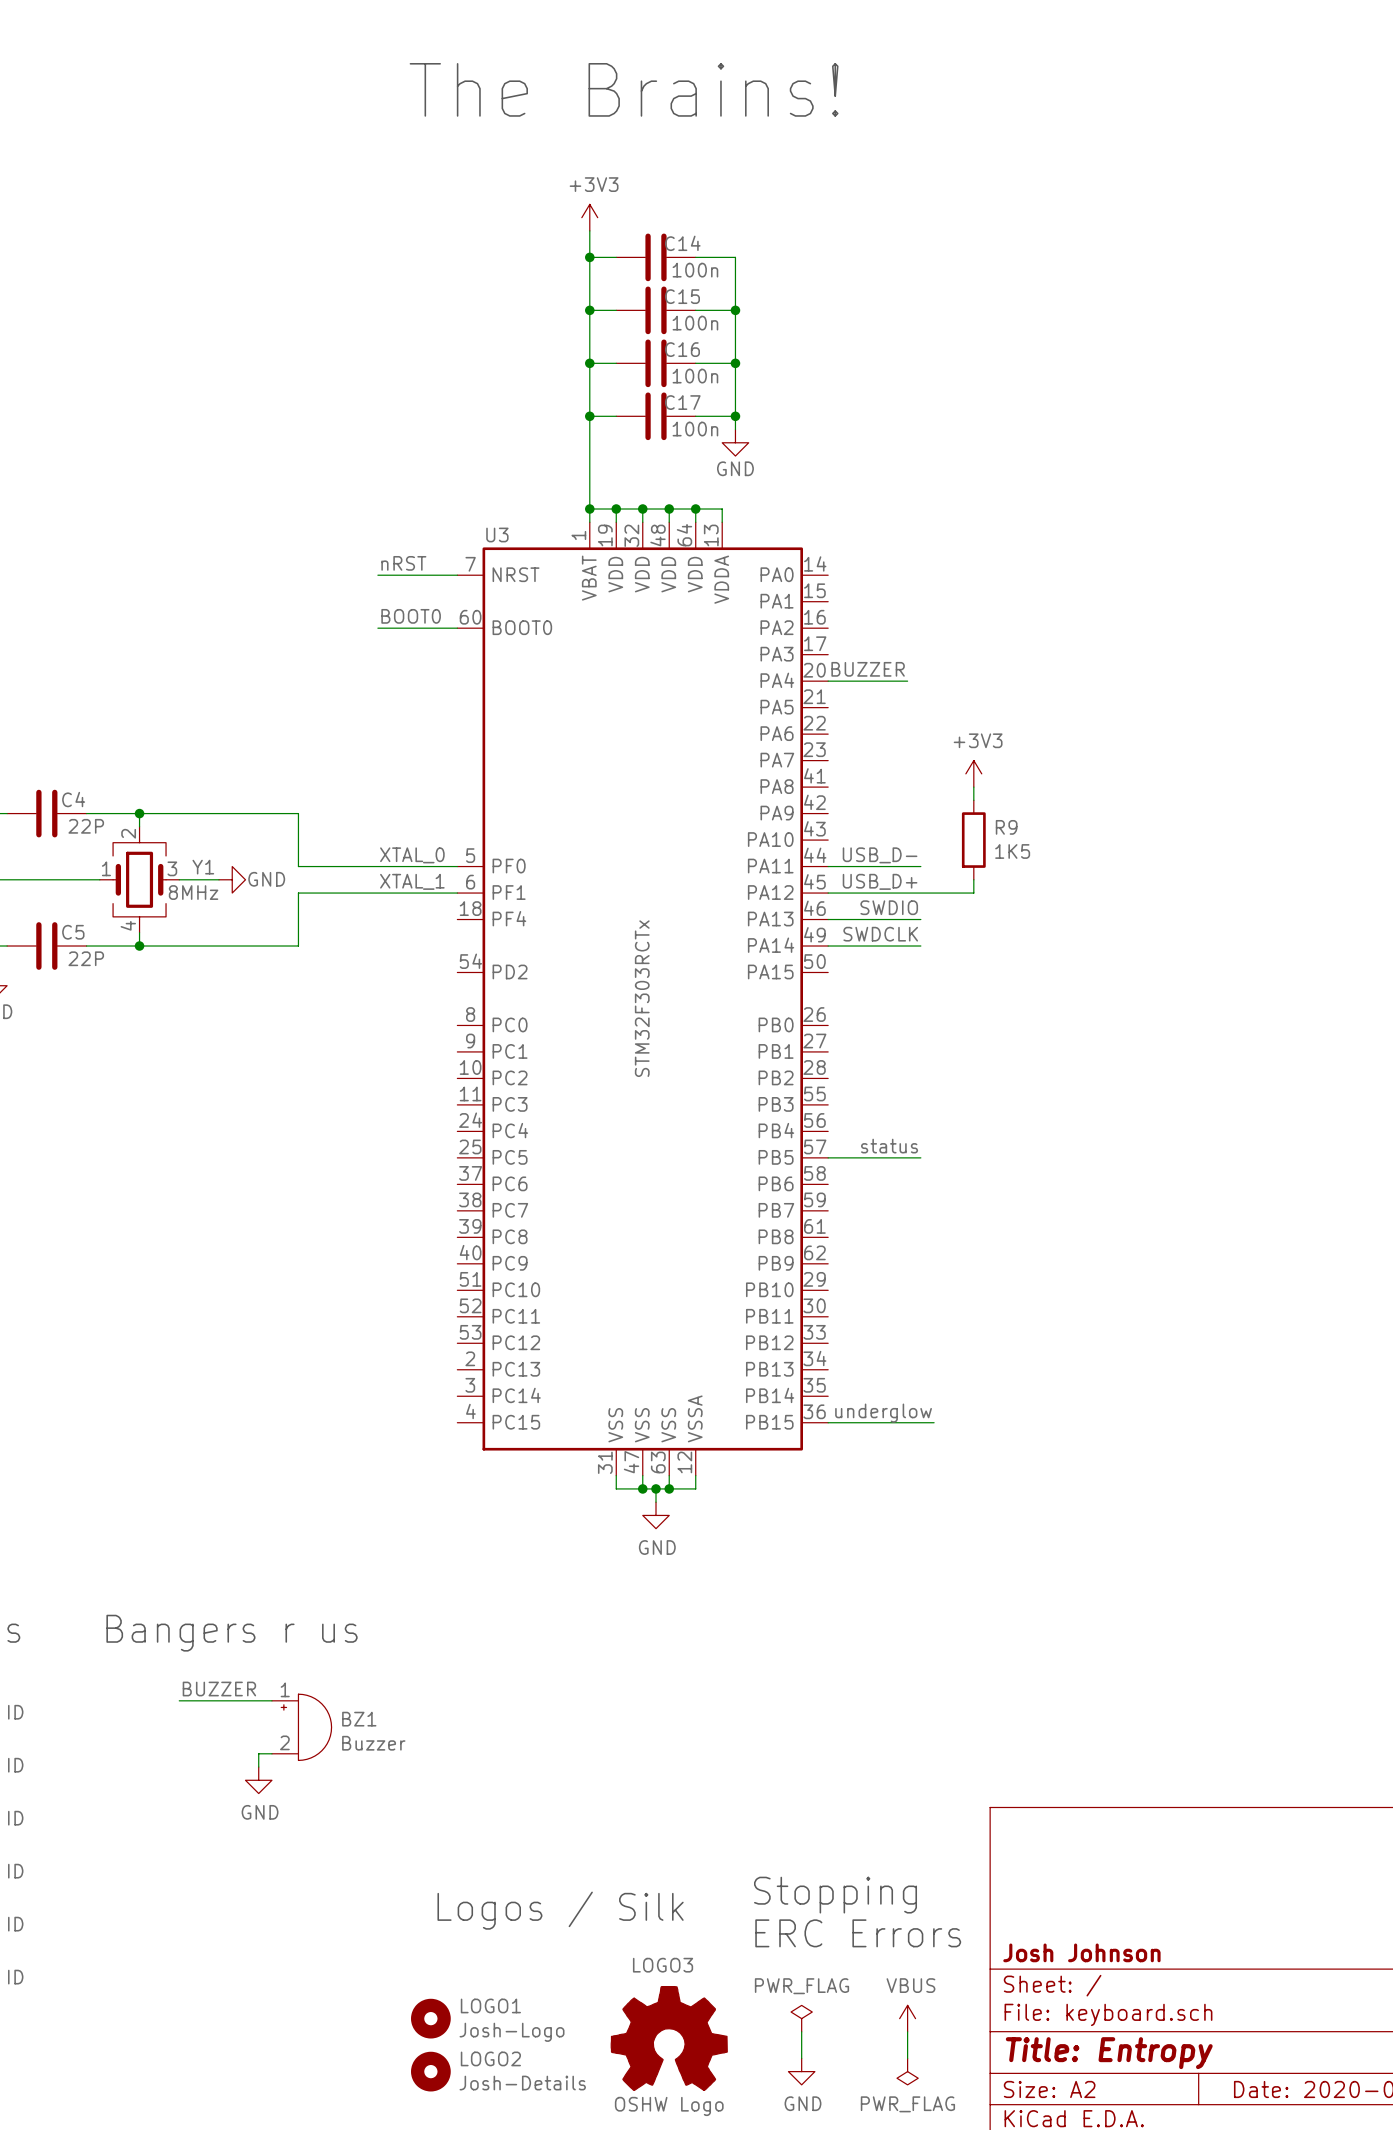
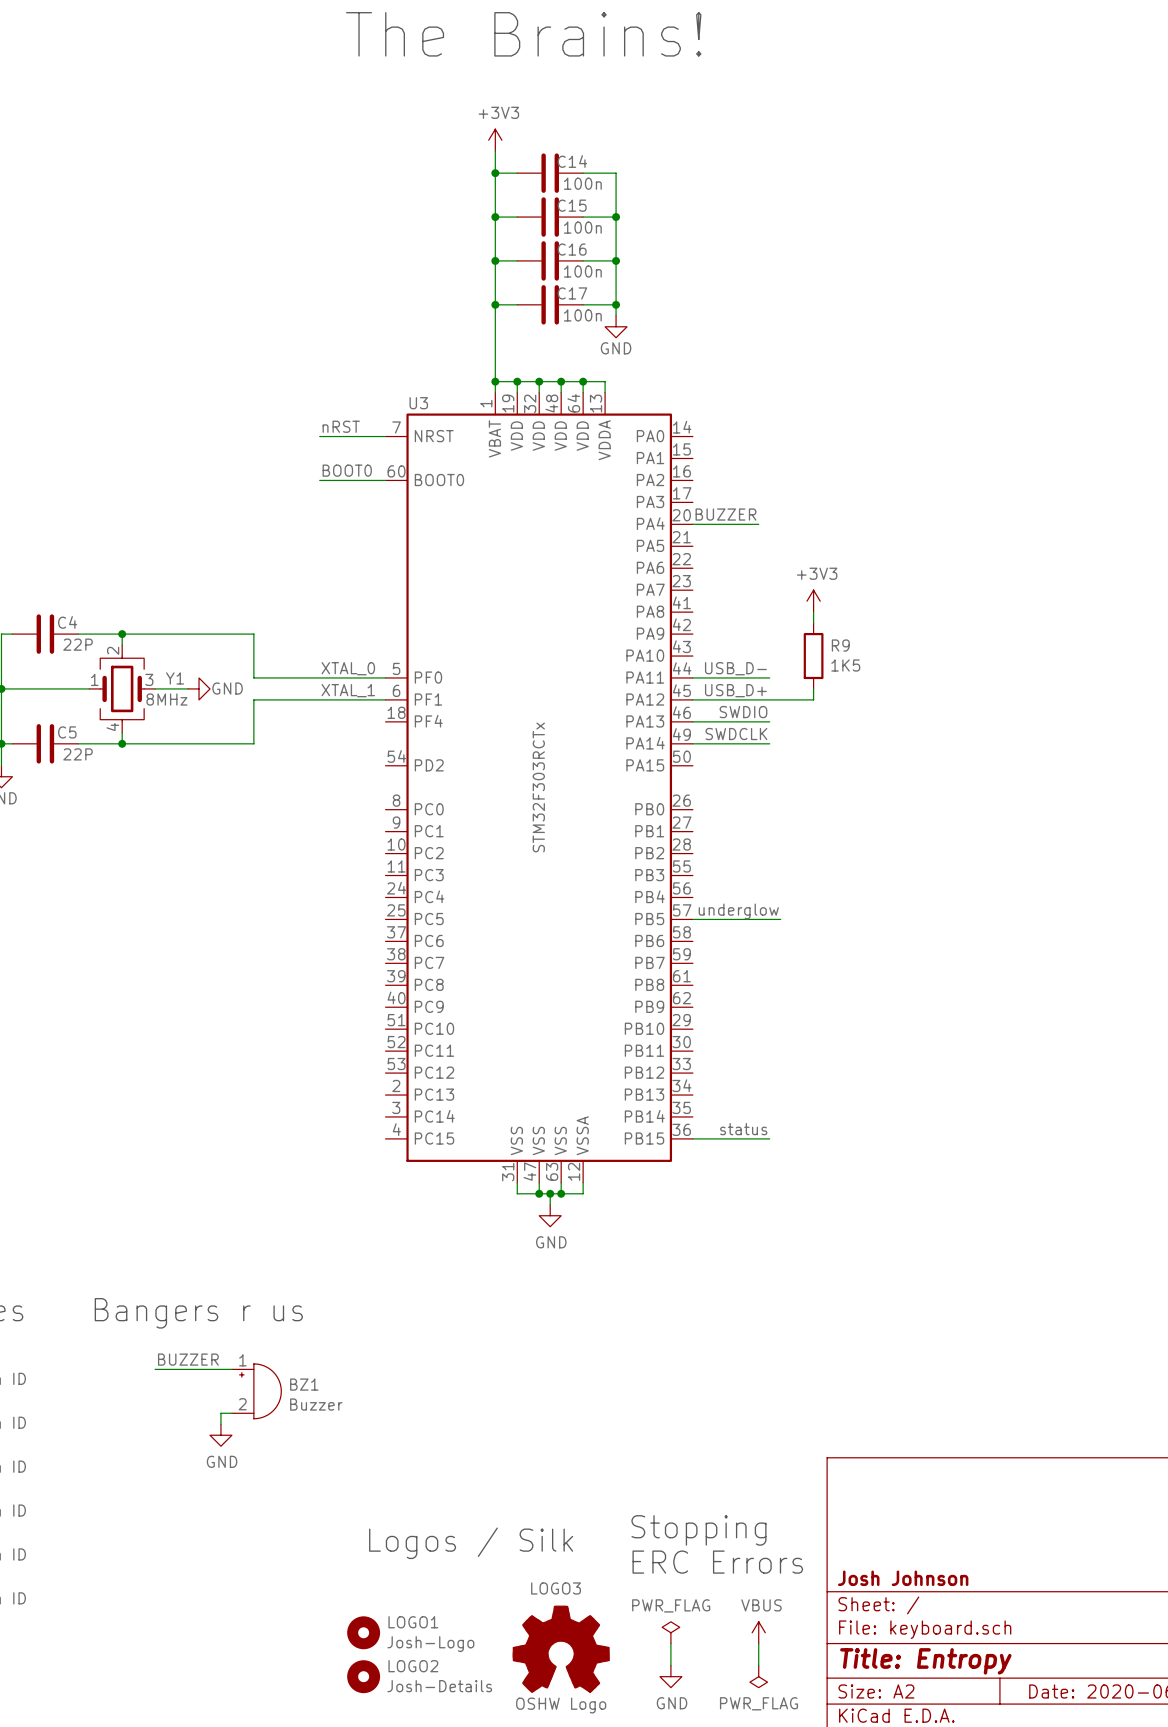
label: status (889, 1146) -> none
label: none -> underglow (738, 911)
wire: none -> (769, 919) (780, 919)
label: none -> status (743, 1129)
label: underglow (883, 1413) -> none
wire: (920, 1422) (934, 1422) -> none

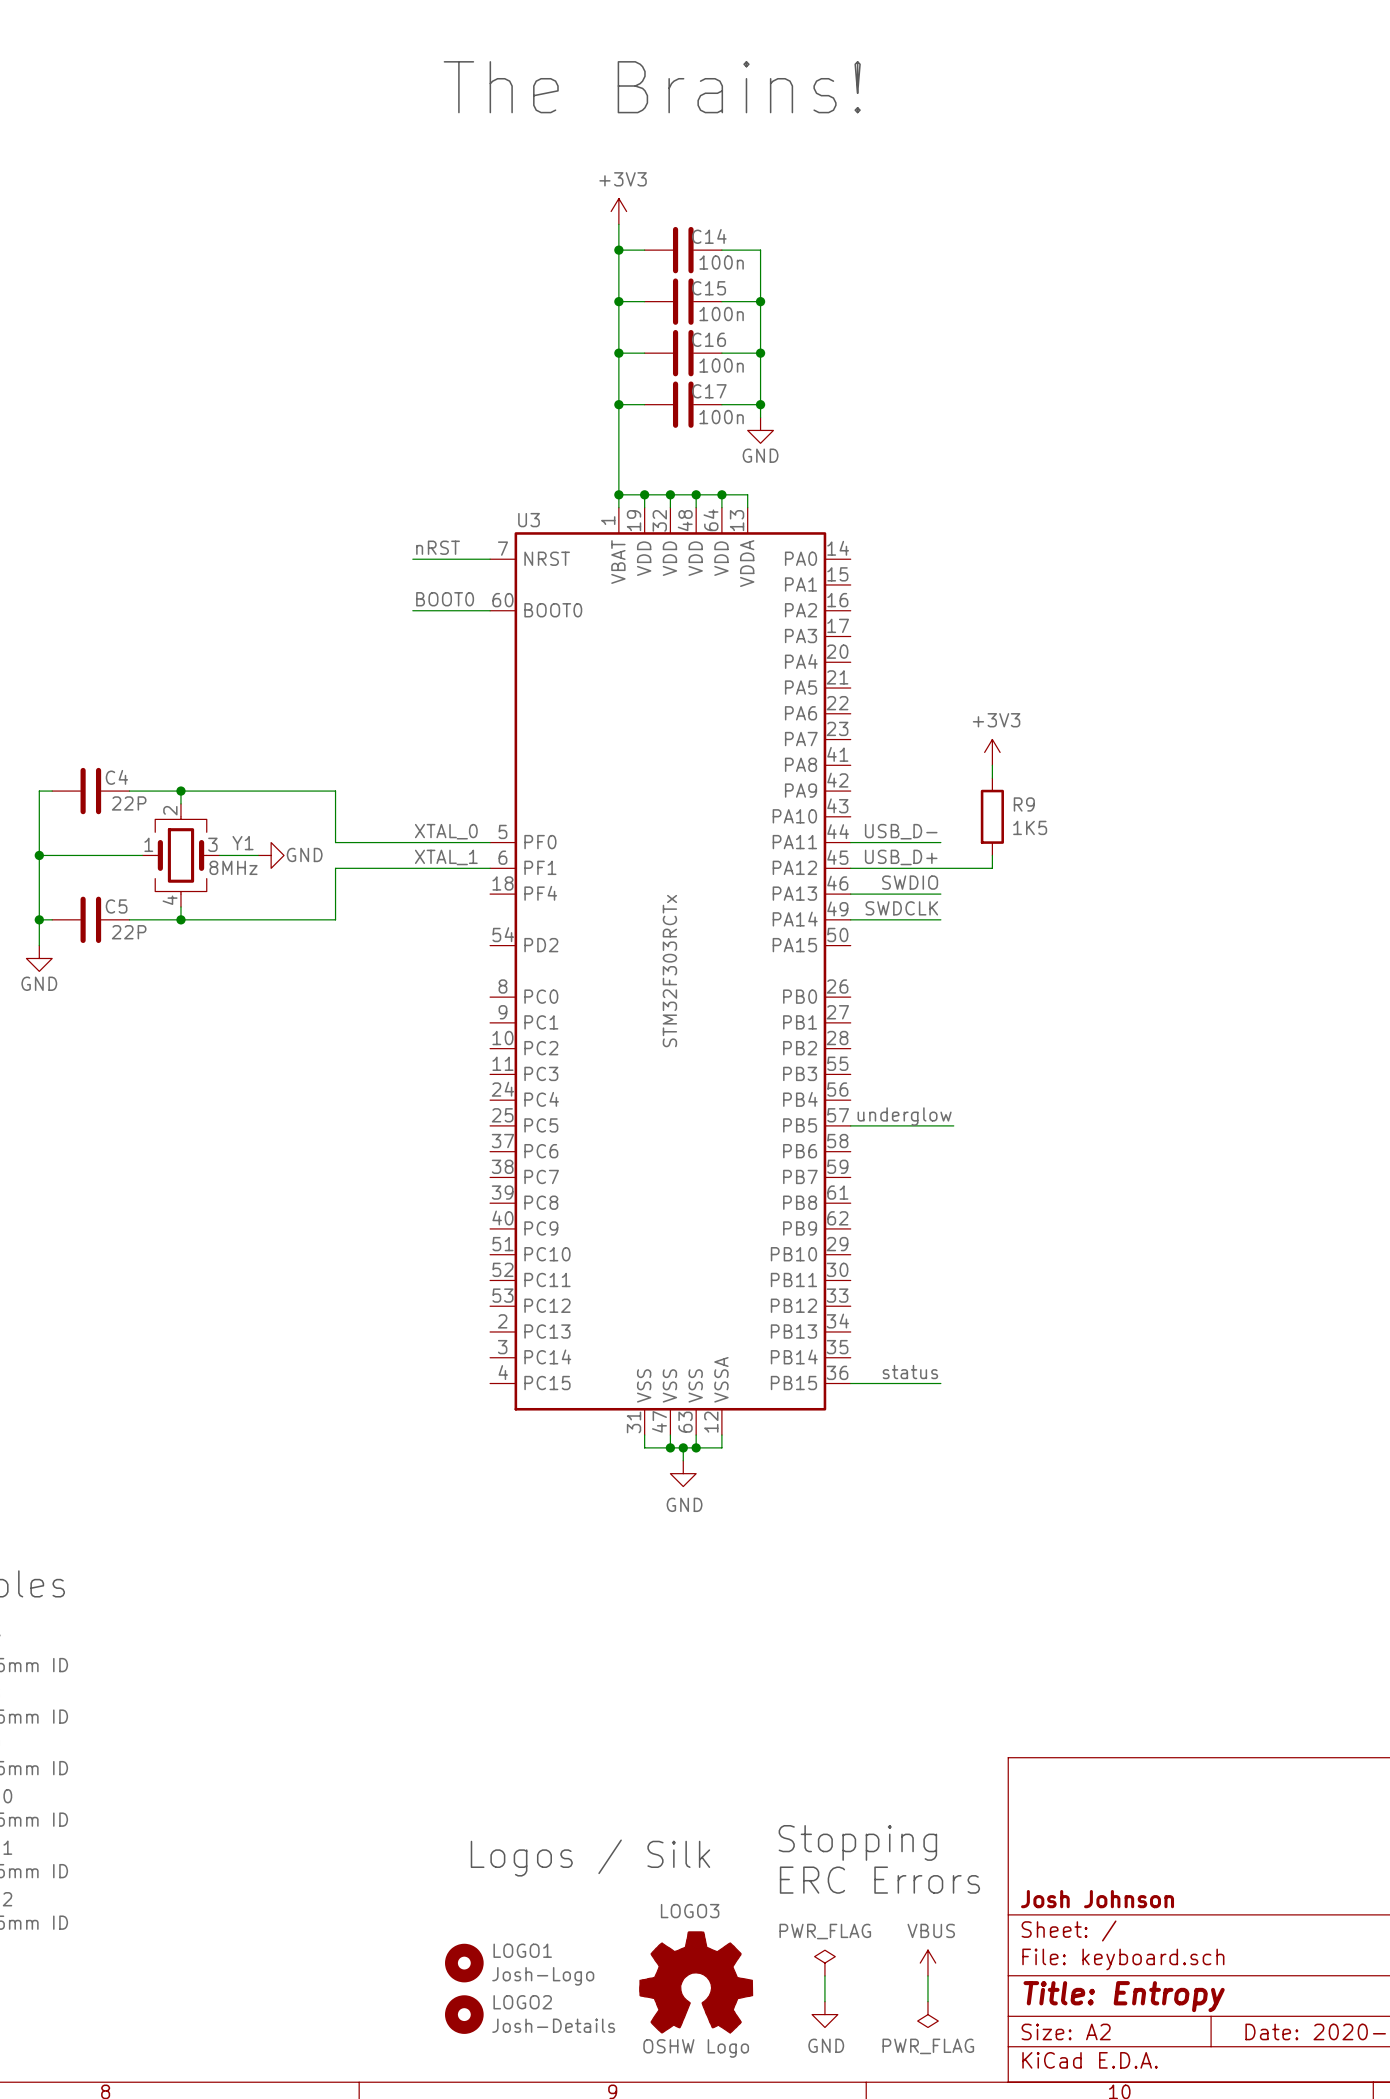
label: BUZZER (725, 514) -> none
wire: (692, 524) (758, 524) -> none
text: Bangers r us (198, 1313) -> none
label: BUZZER (188, 1359) -> none
wire: (155, 1369) (231, 1369) -> none
BZ1: Buzzer (256, 1391) -> none
wire: (231, 1413) (220, 1413) (220, 1424) -> none
power symbol: GND (220, 1435) -> none

